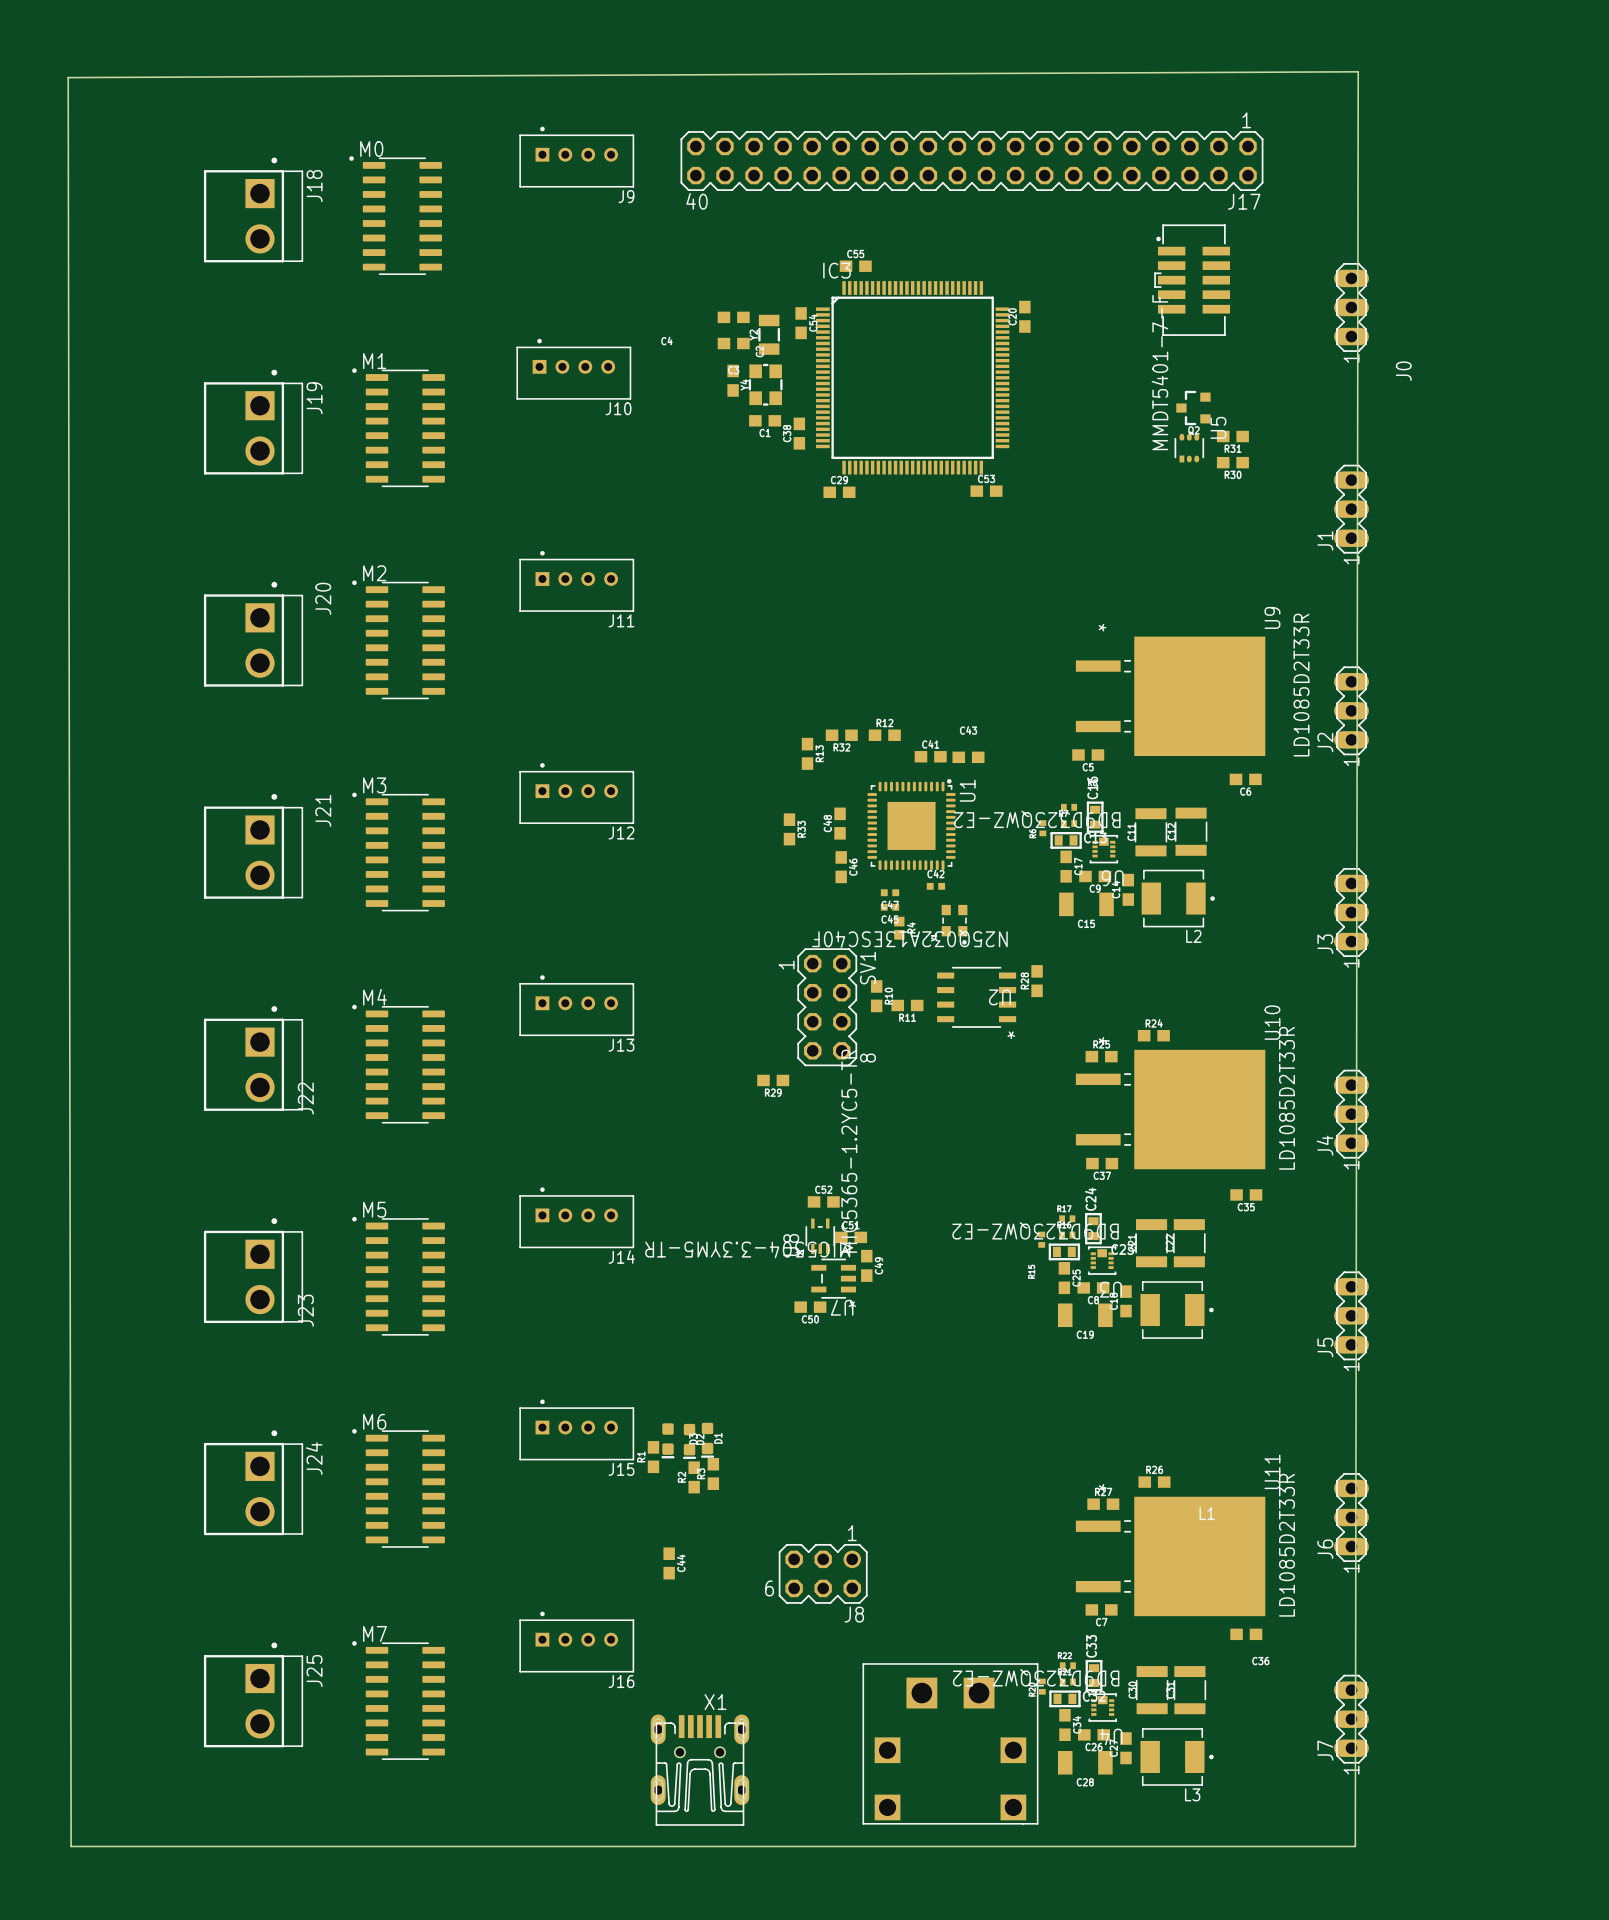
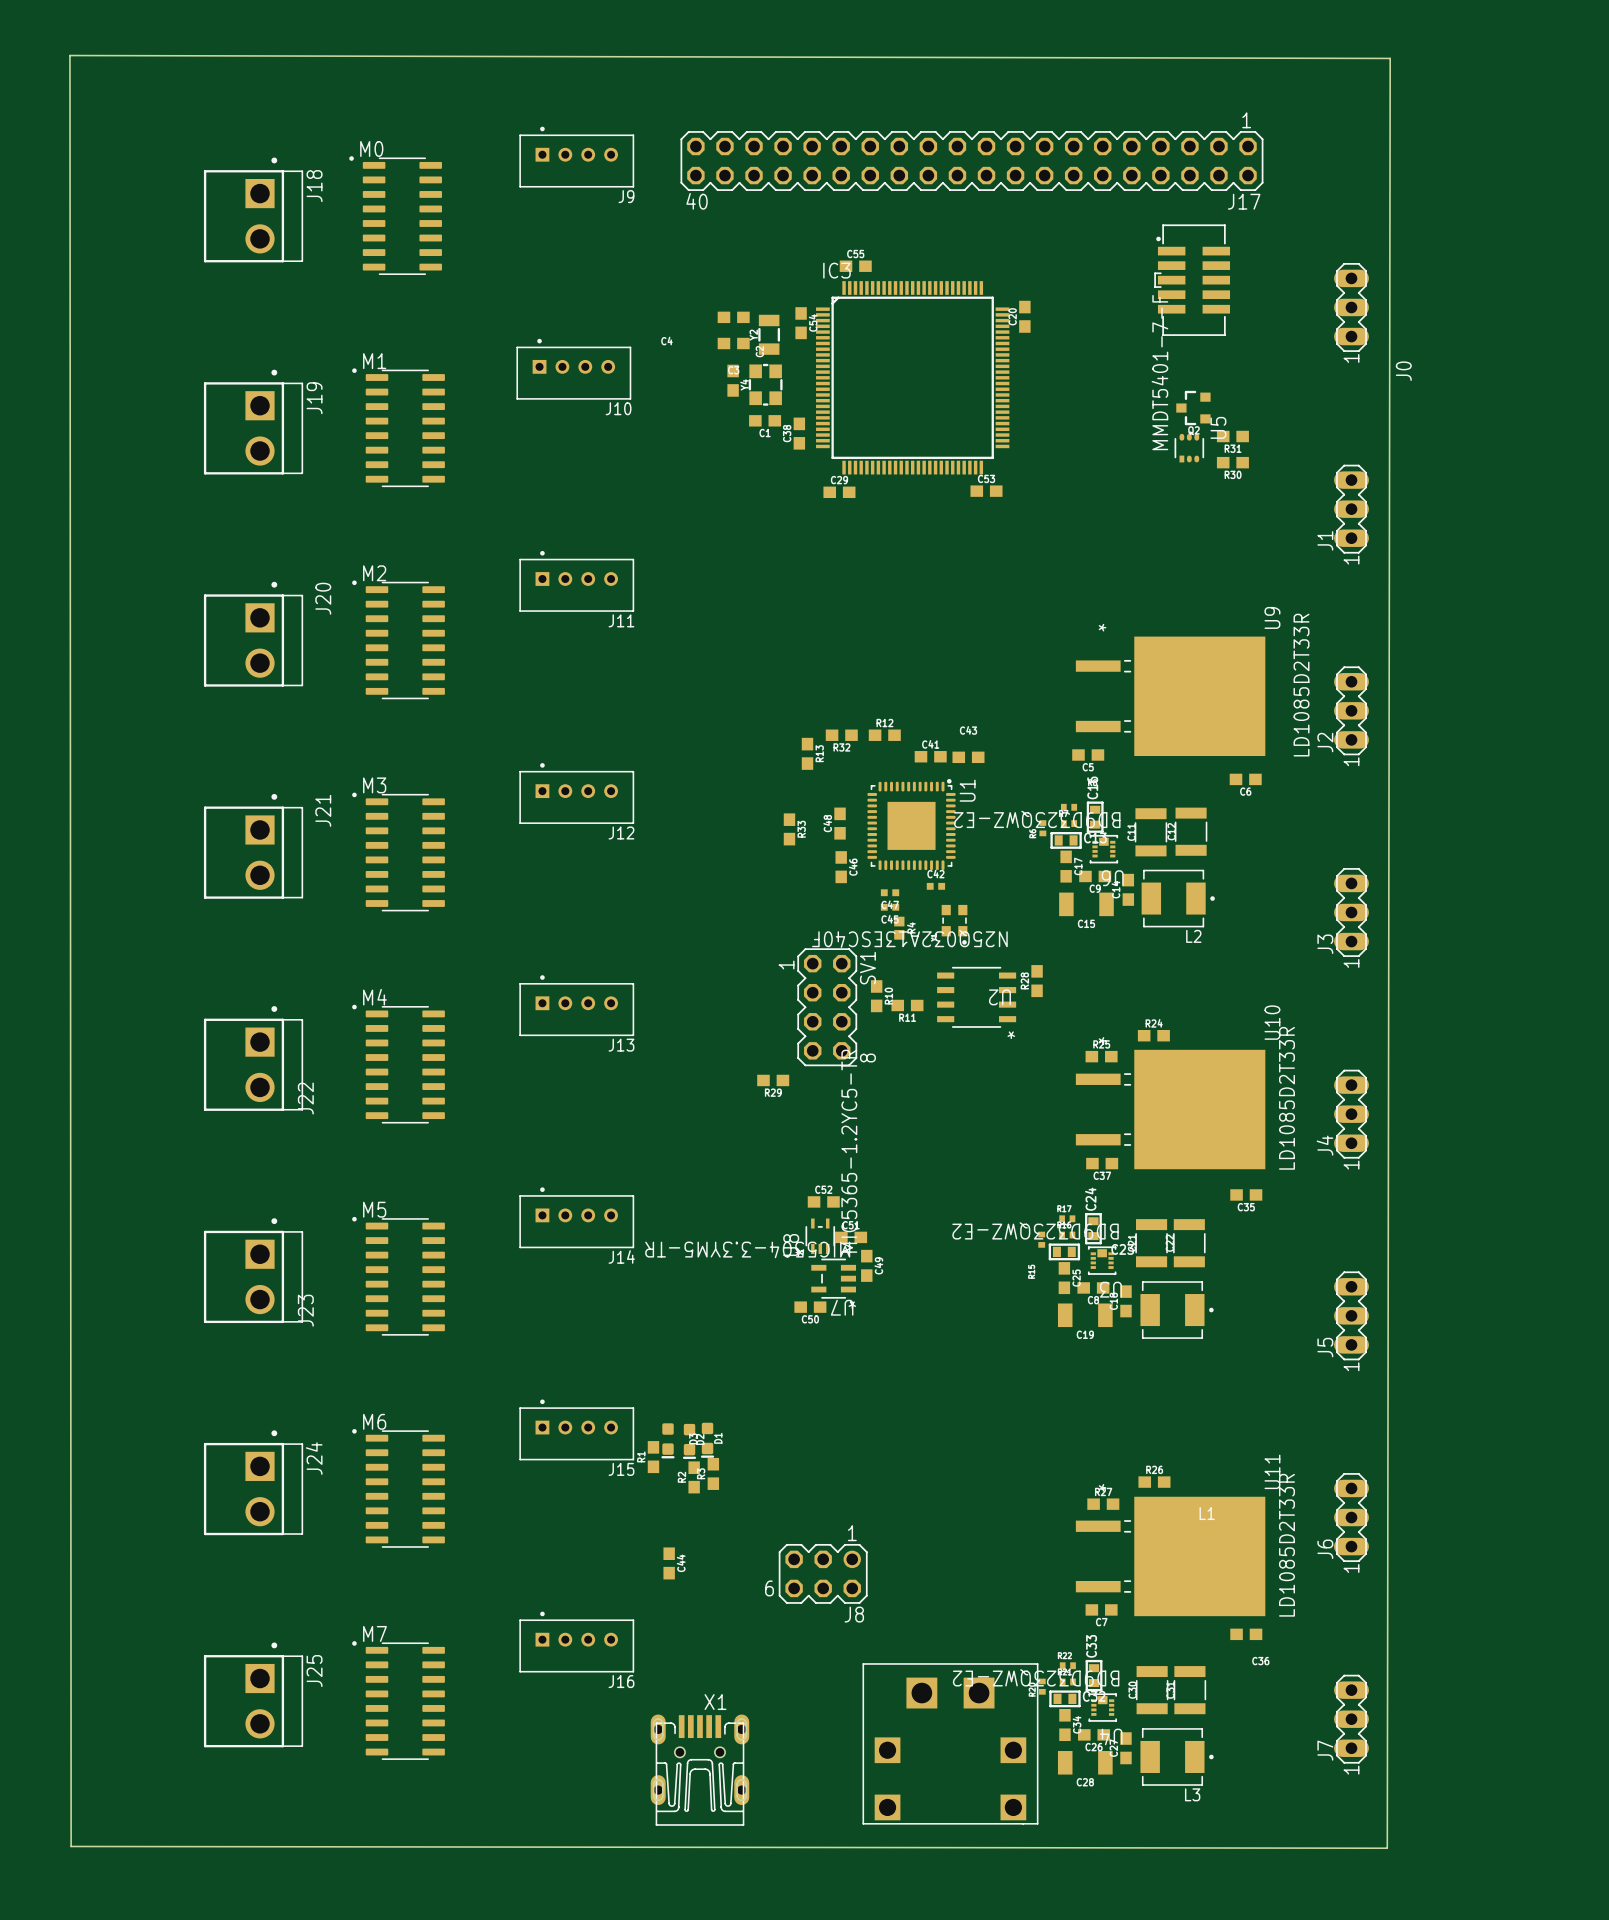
board edge: (1358, 71) (1355, 1846) (71, 1846) (68, 77) (1358, 71) -> (69, 55) (71, 1846) (1387, 1848) (1390, 58) (69, 55)

